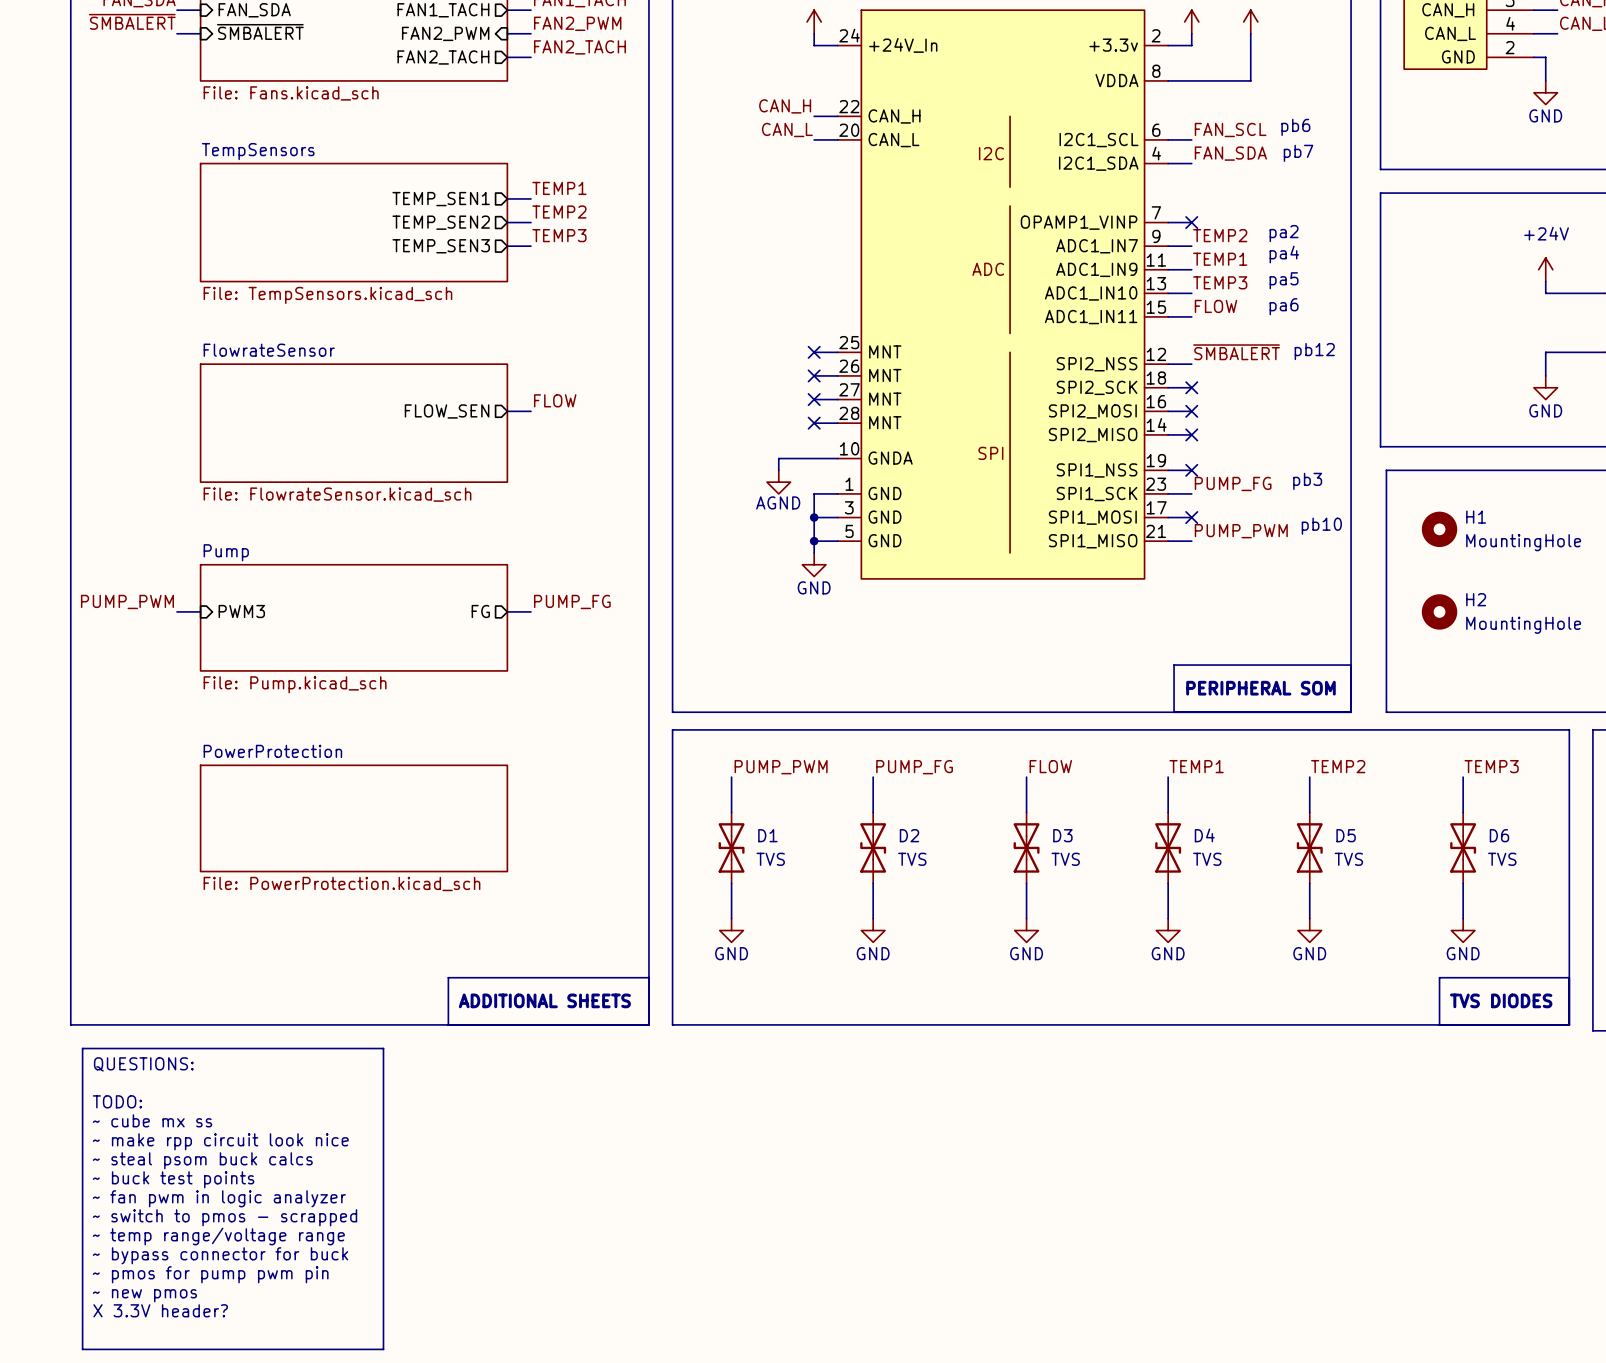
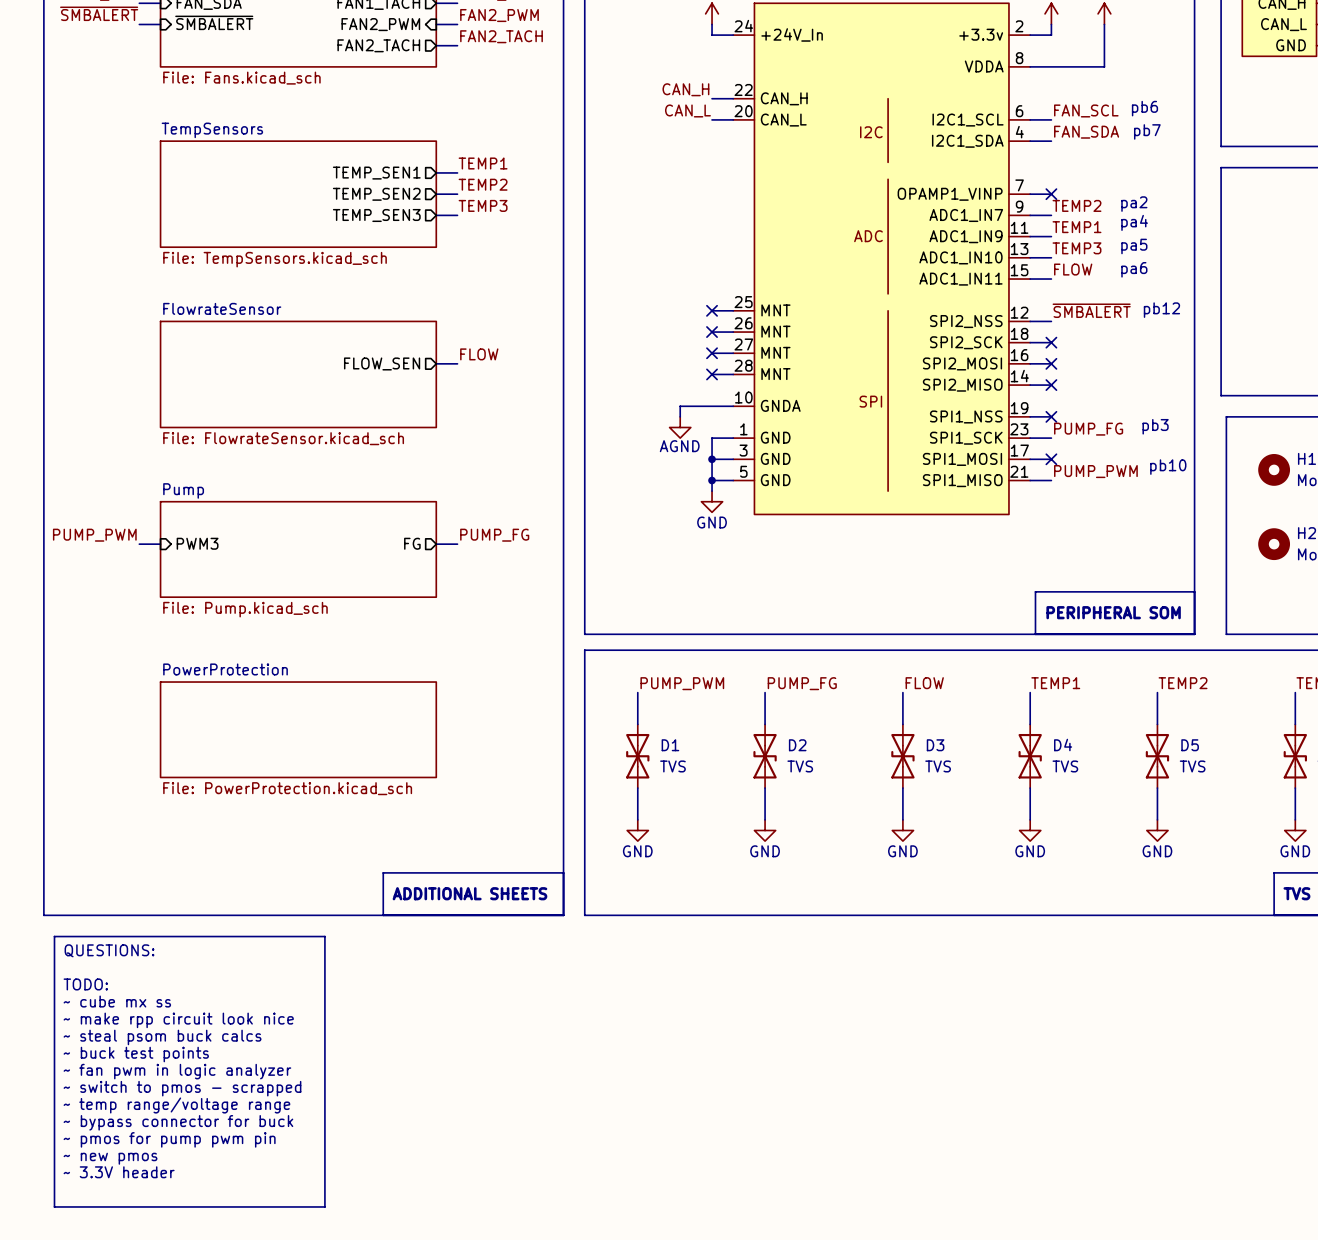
text: X 3.3V header? (160, 1310) -> ~ 3.3V header (119, 1172)

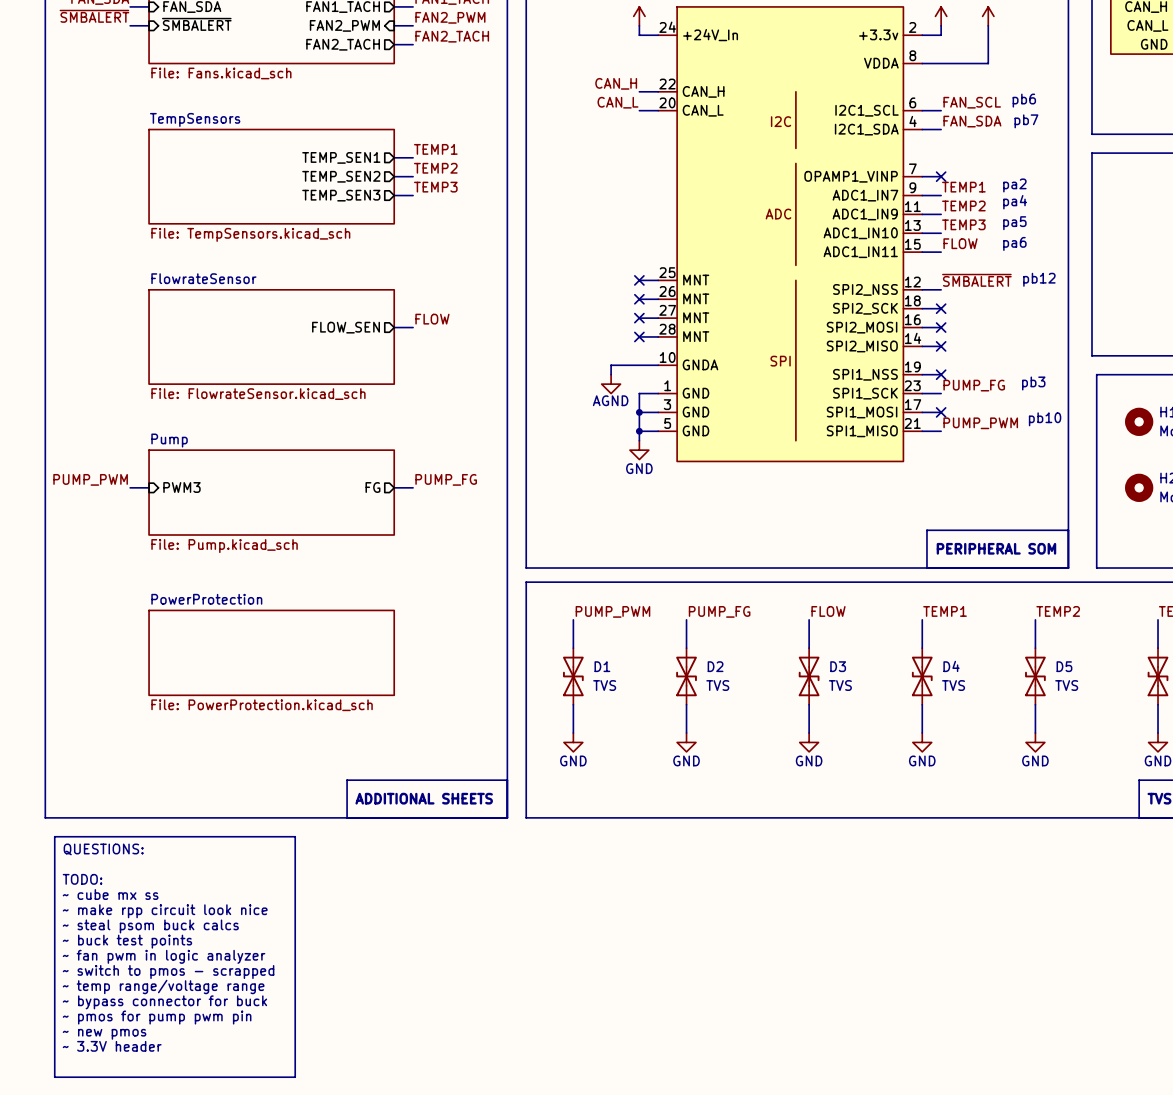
label: TEMP2 (1076, 205) -> TEMP1 (963, 187)
label: TEMP1 (1076, 227) -> TEMP2 (963, 205)

